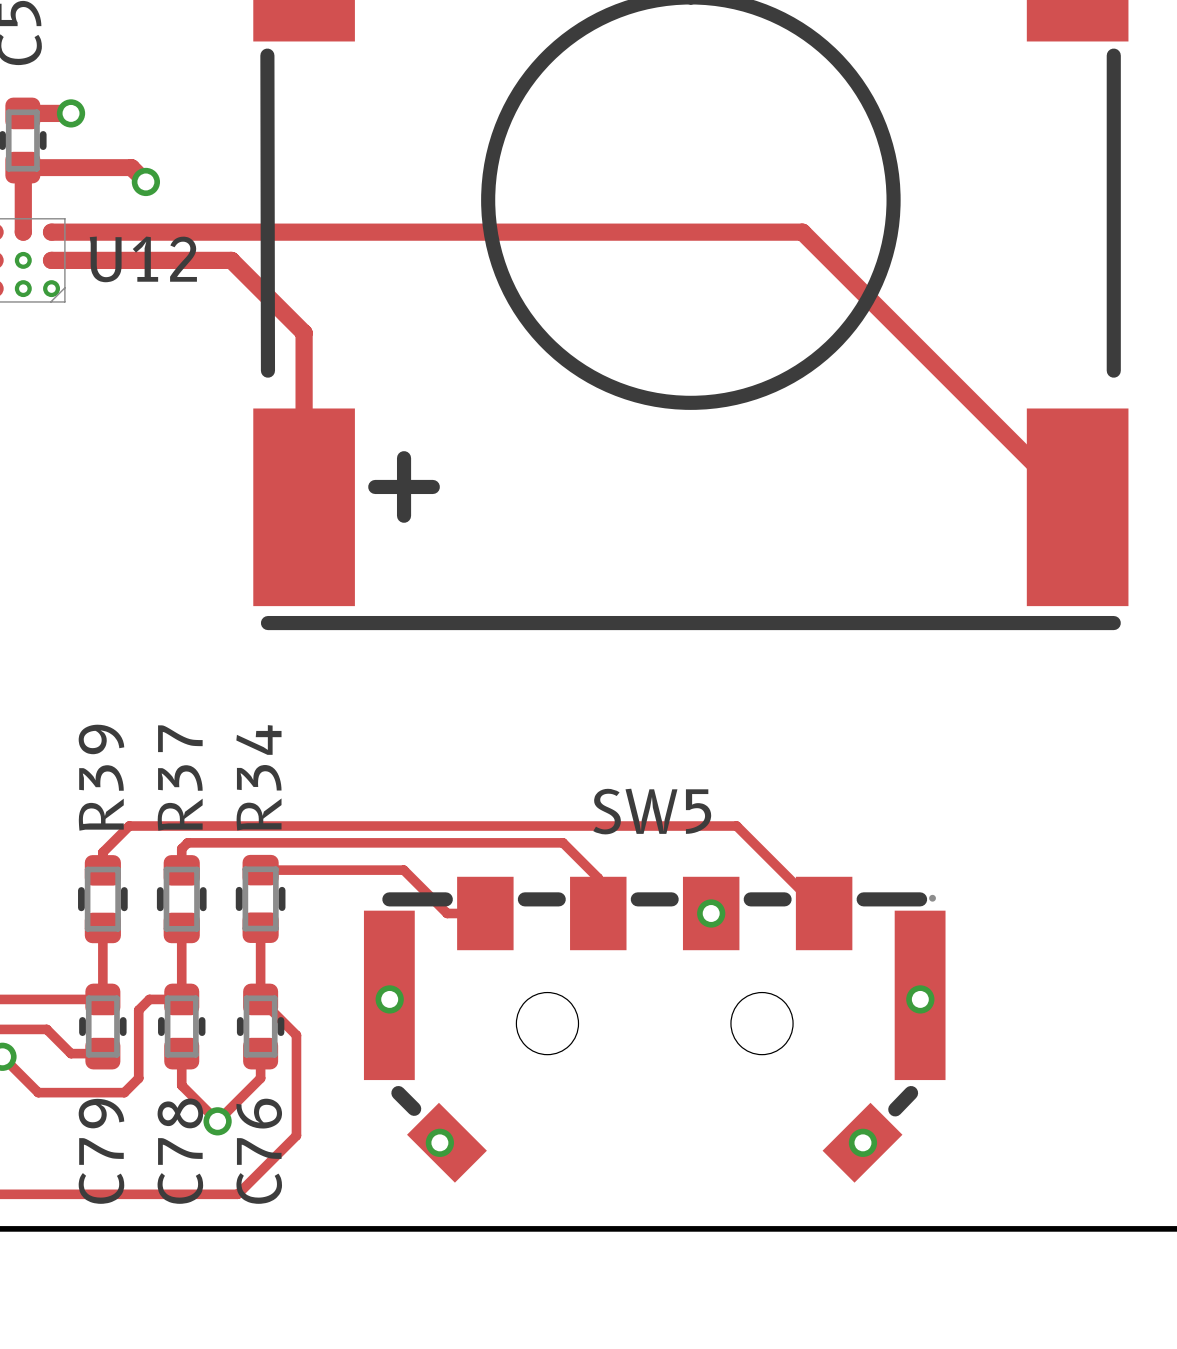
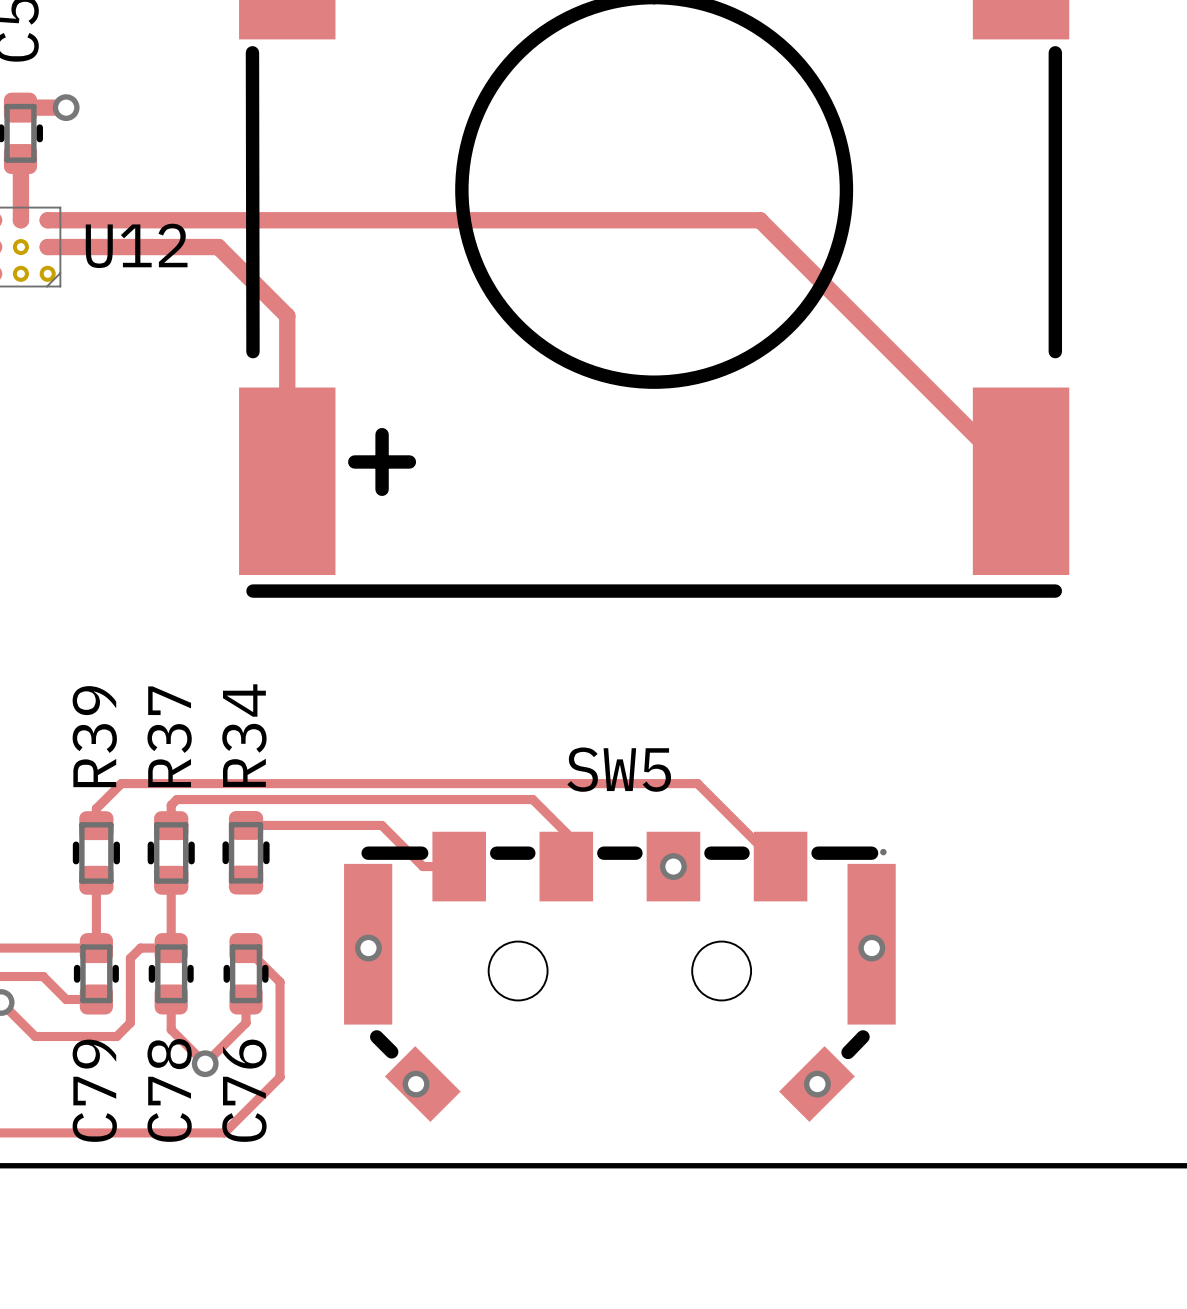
track: (22, 167) (131, 167) (145, 181) -> none
via: (145, 181) -> none
track: (260, 927) (260, 999) -> none

